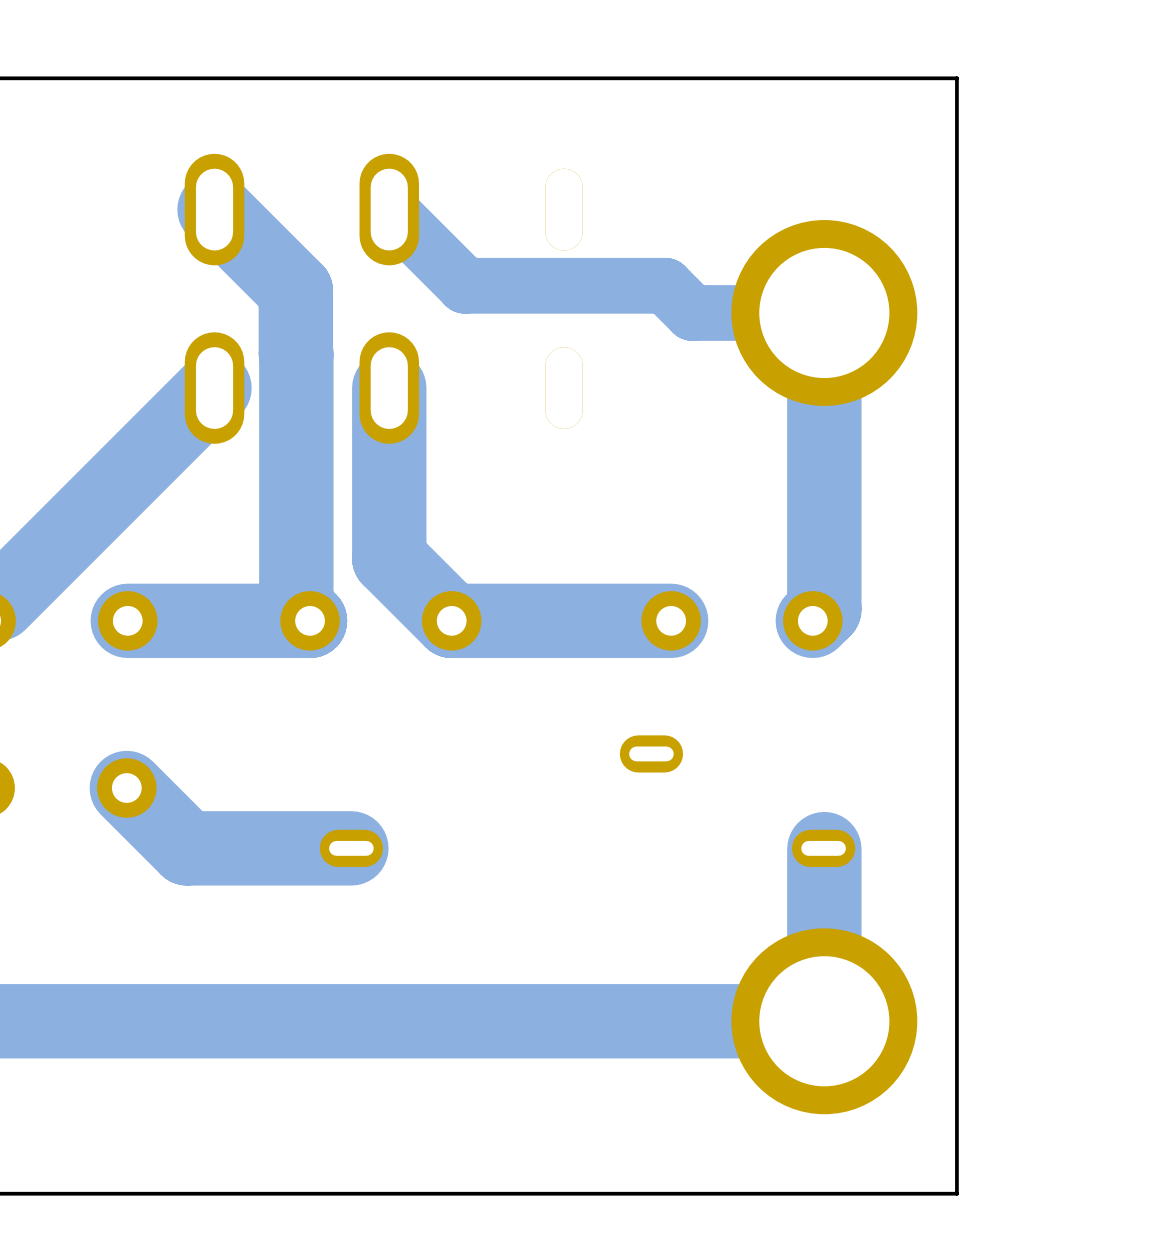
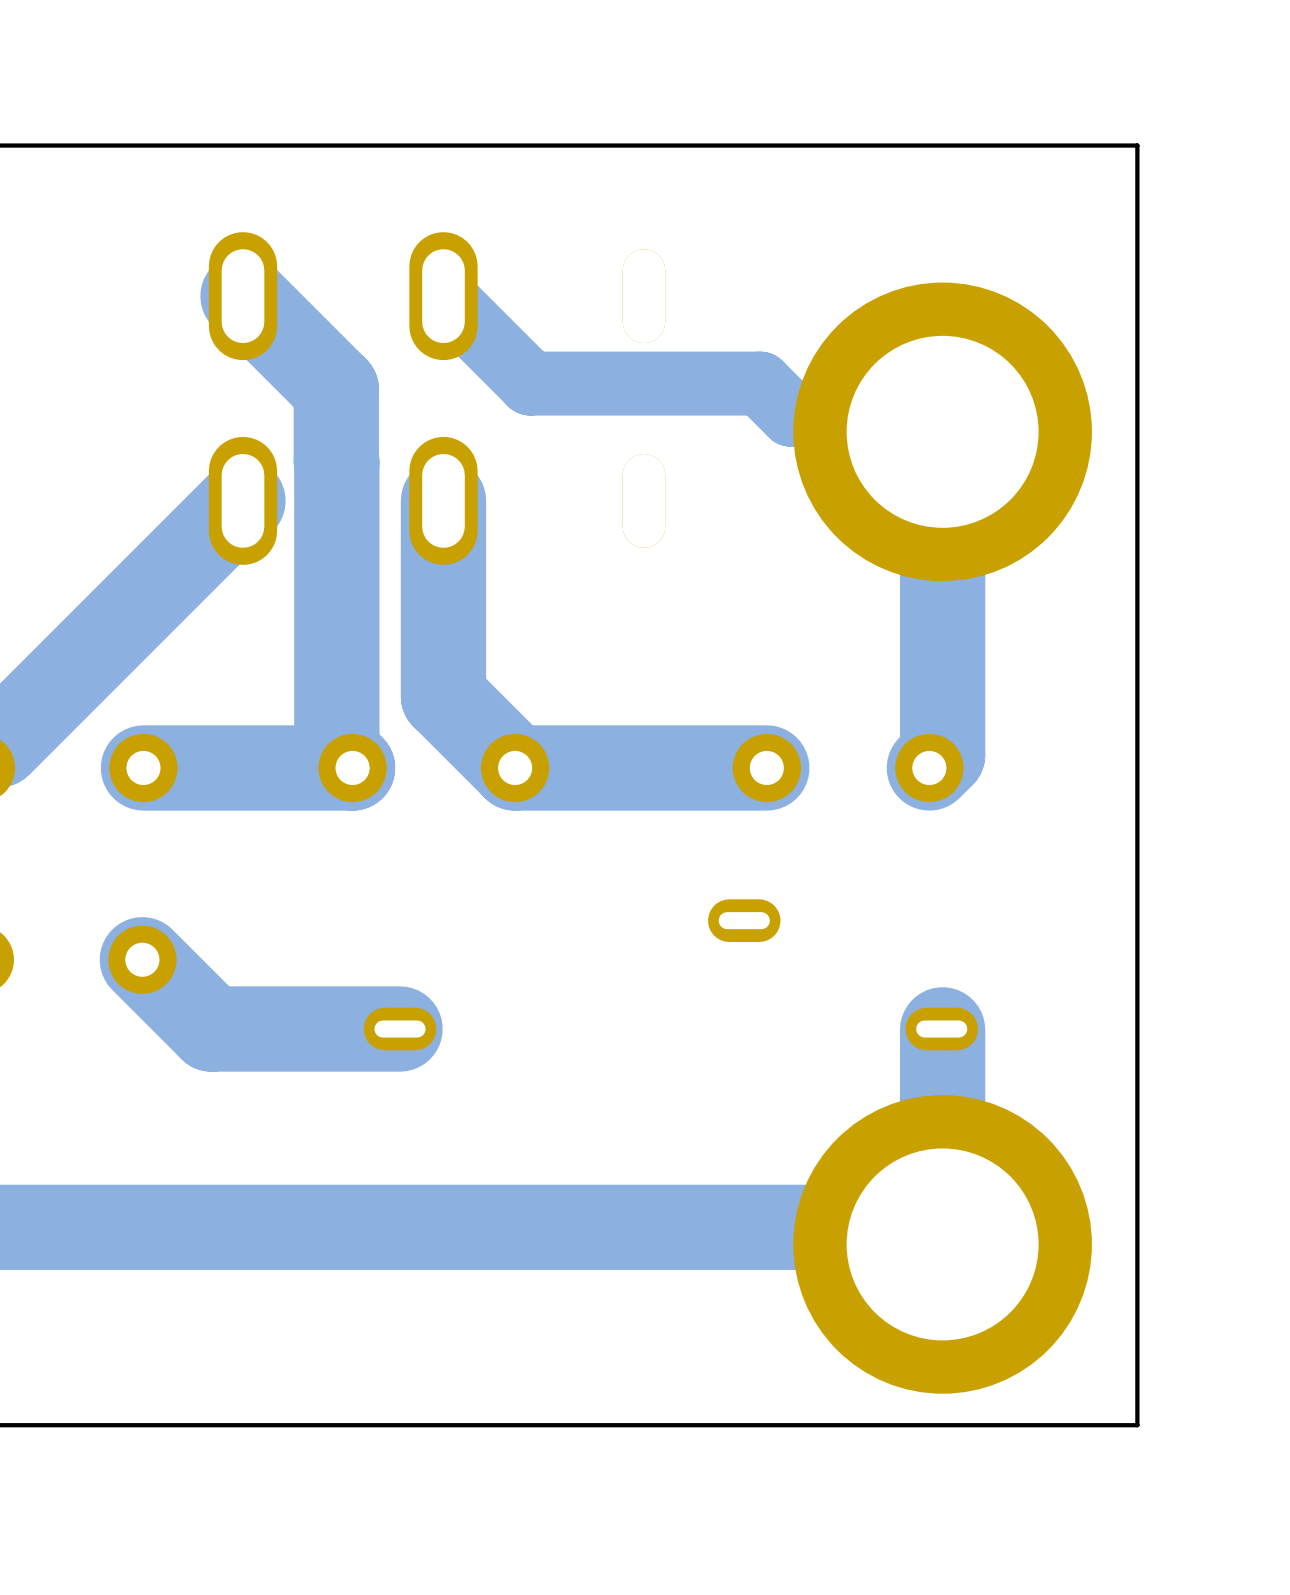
board edge: (956, 78) (956, 1193) -> (1094, 145) (1137, 145) (1137, 1425) (1094, 1425)
part footprint: [731, 220, 918, 406] -> [793, 282, 1092, 582]
part footprint: [731, 928, 918, 1115] -> [793, 1095, 1092, 1394]

